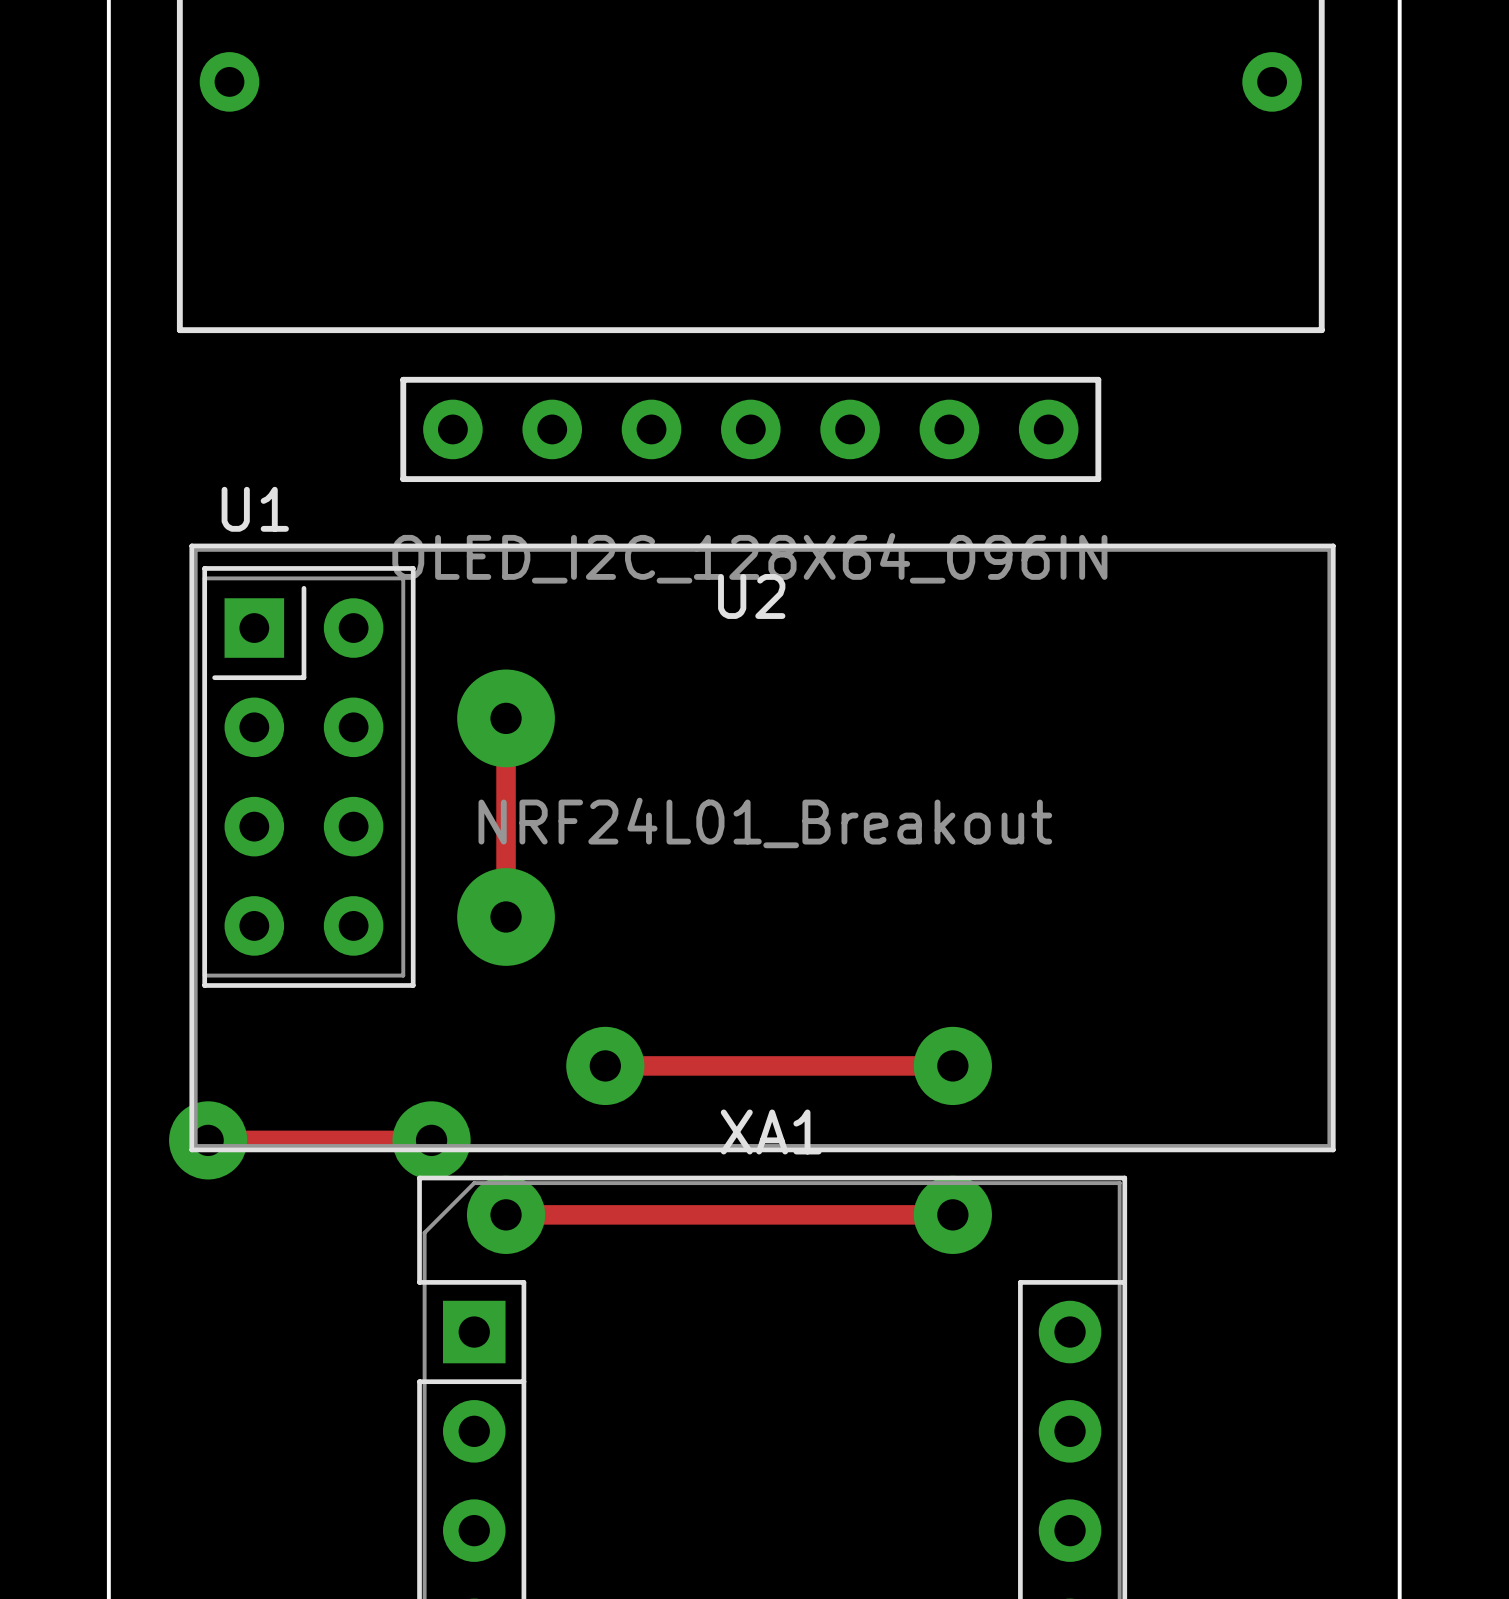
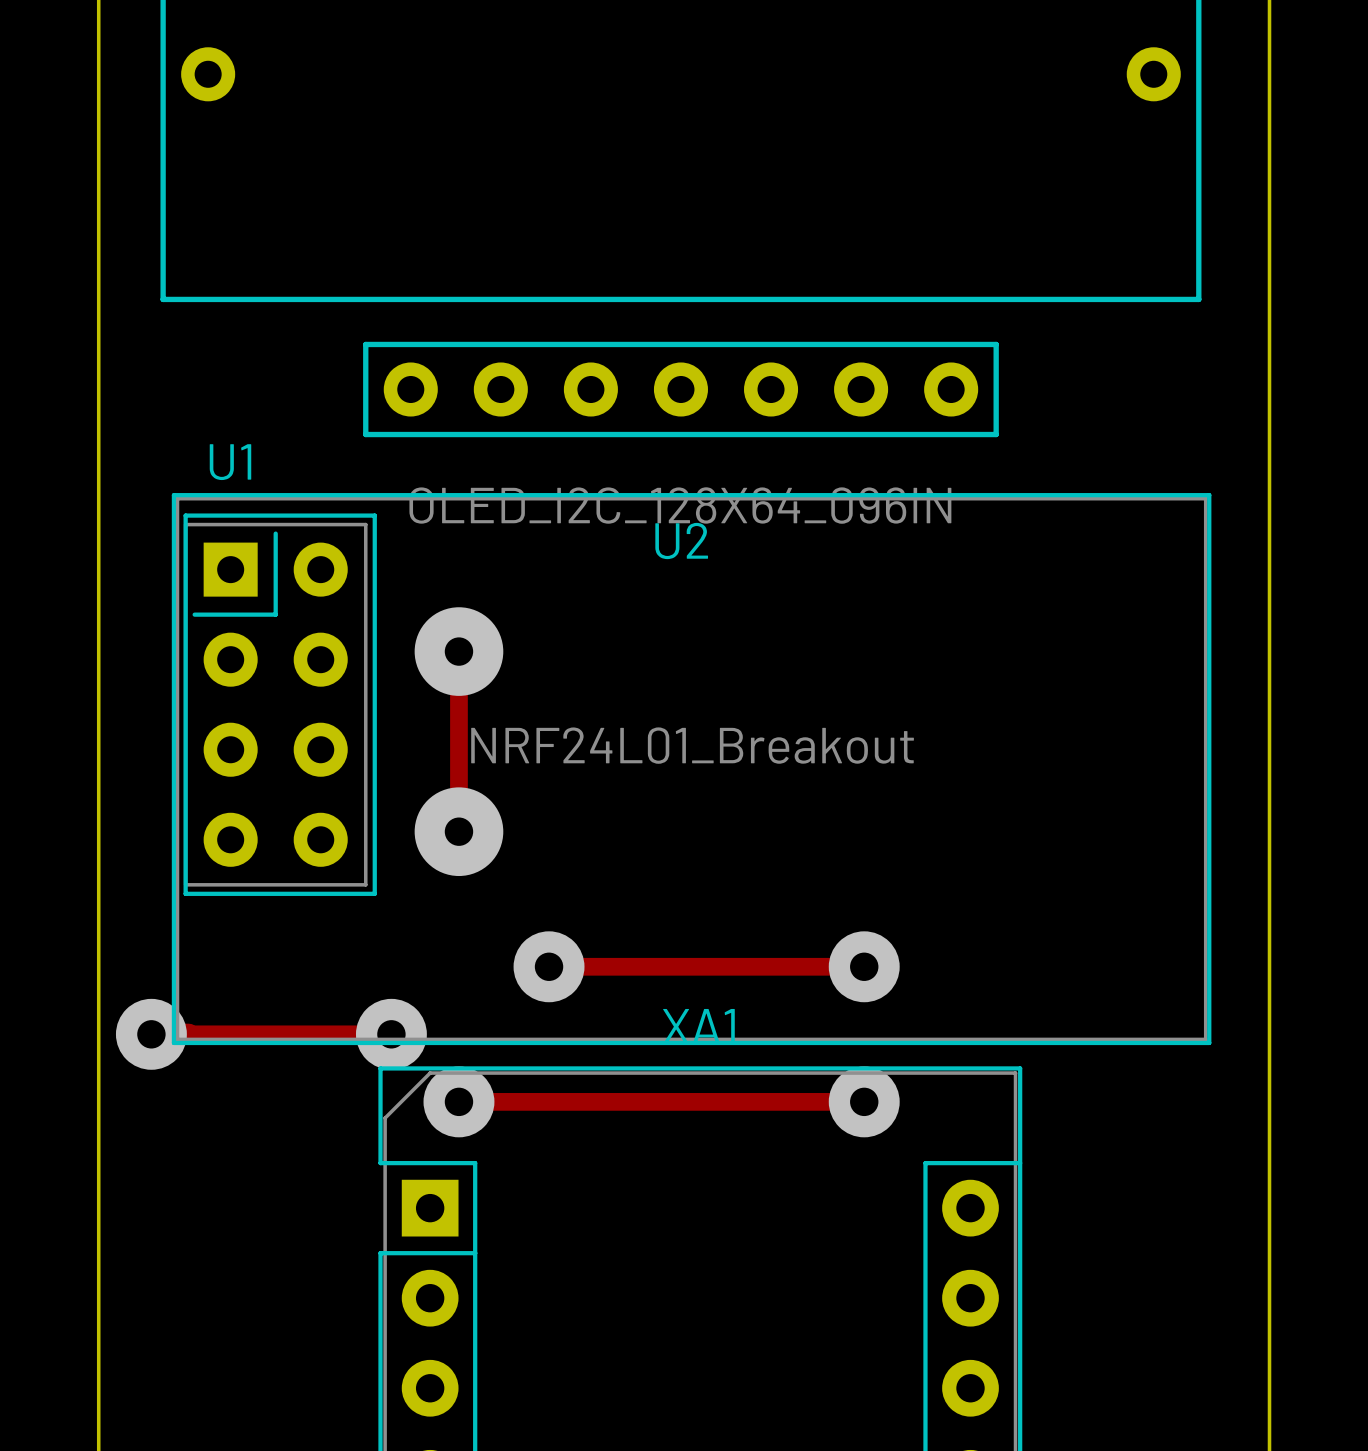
via position: (208, 1140) -> (151, 1034)

